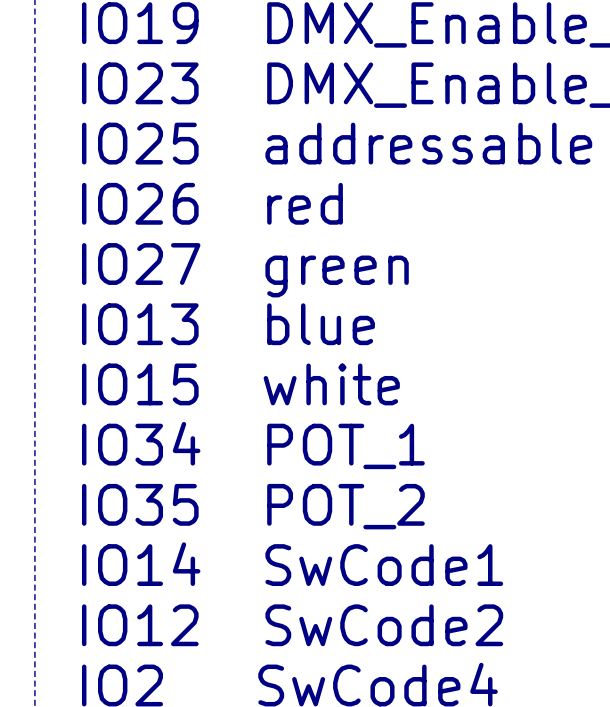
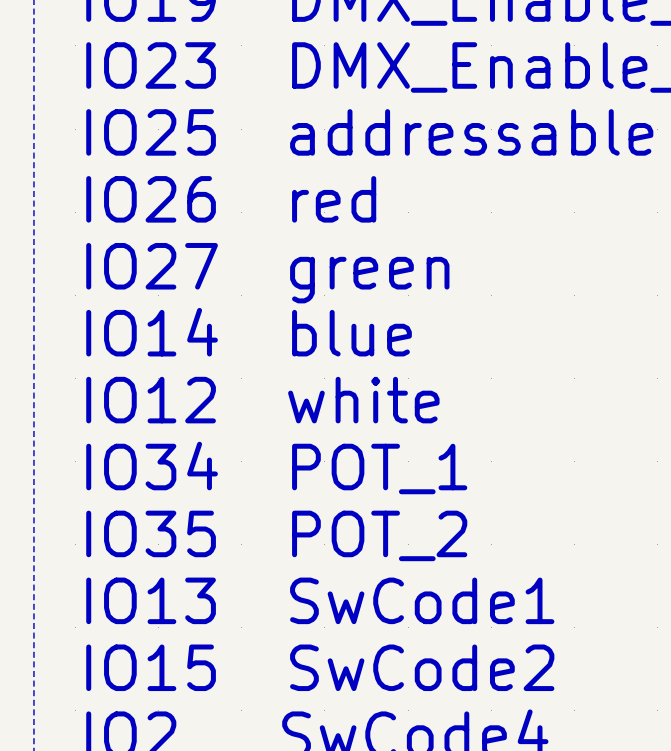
text: IO13 blue (228, 324) -> IO14 blue (249, 332)
text: IO15 white (240, 384) -> IO12 white (262, 400)
text: IO14 SwCode1 (292, 564) -> IO13 SwCode1 (320, 600)
text: IO12 SwCode2 (292, 625) -> IO15 SwCode2 (320, 667)

